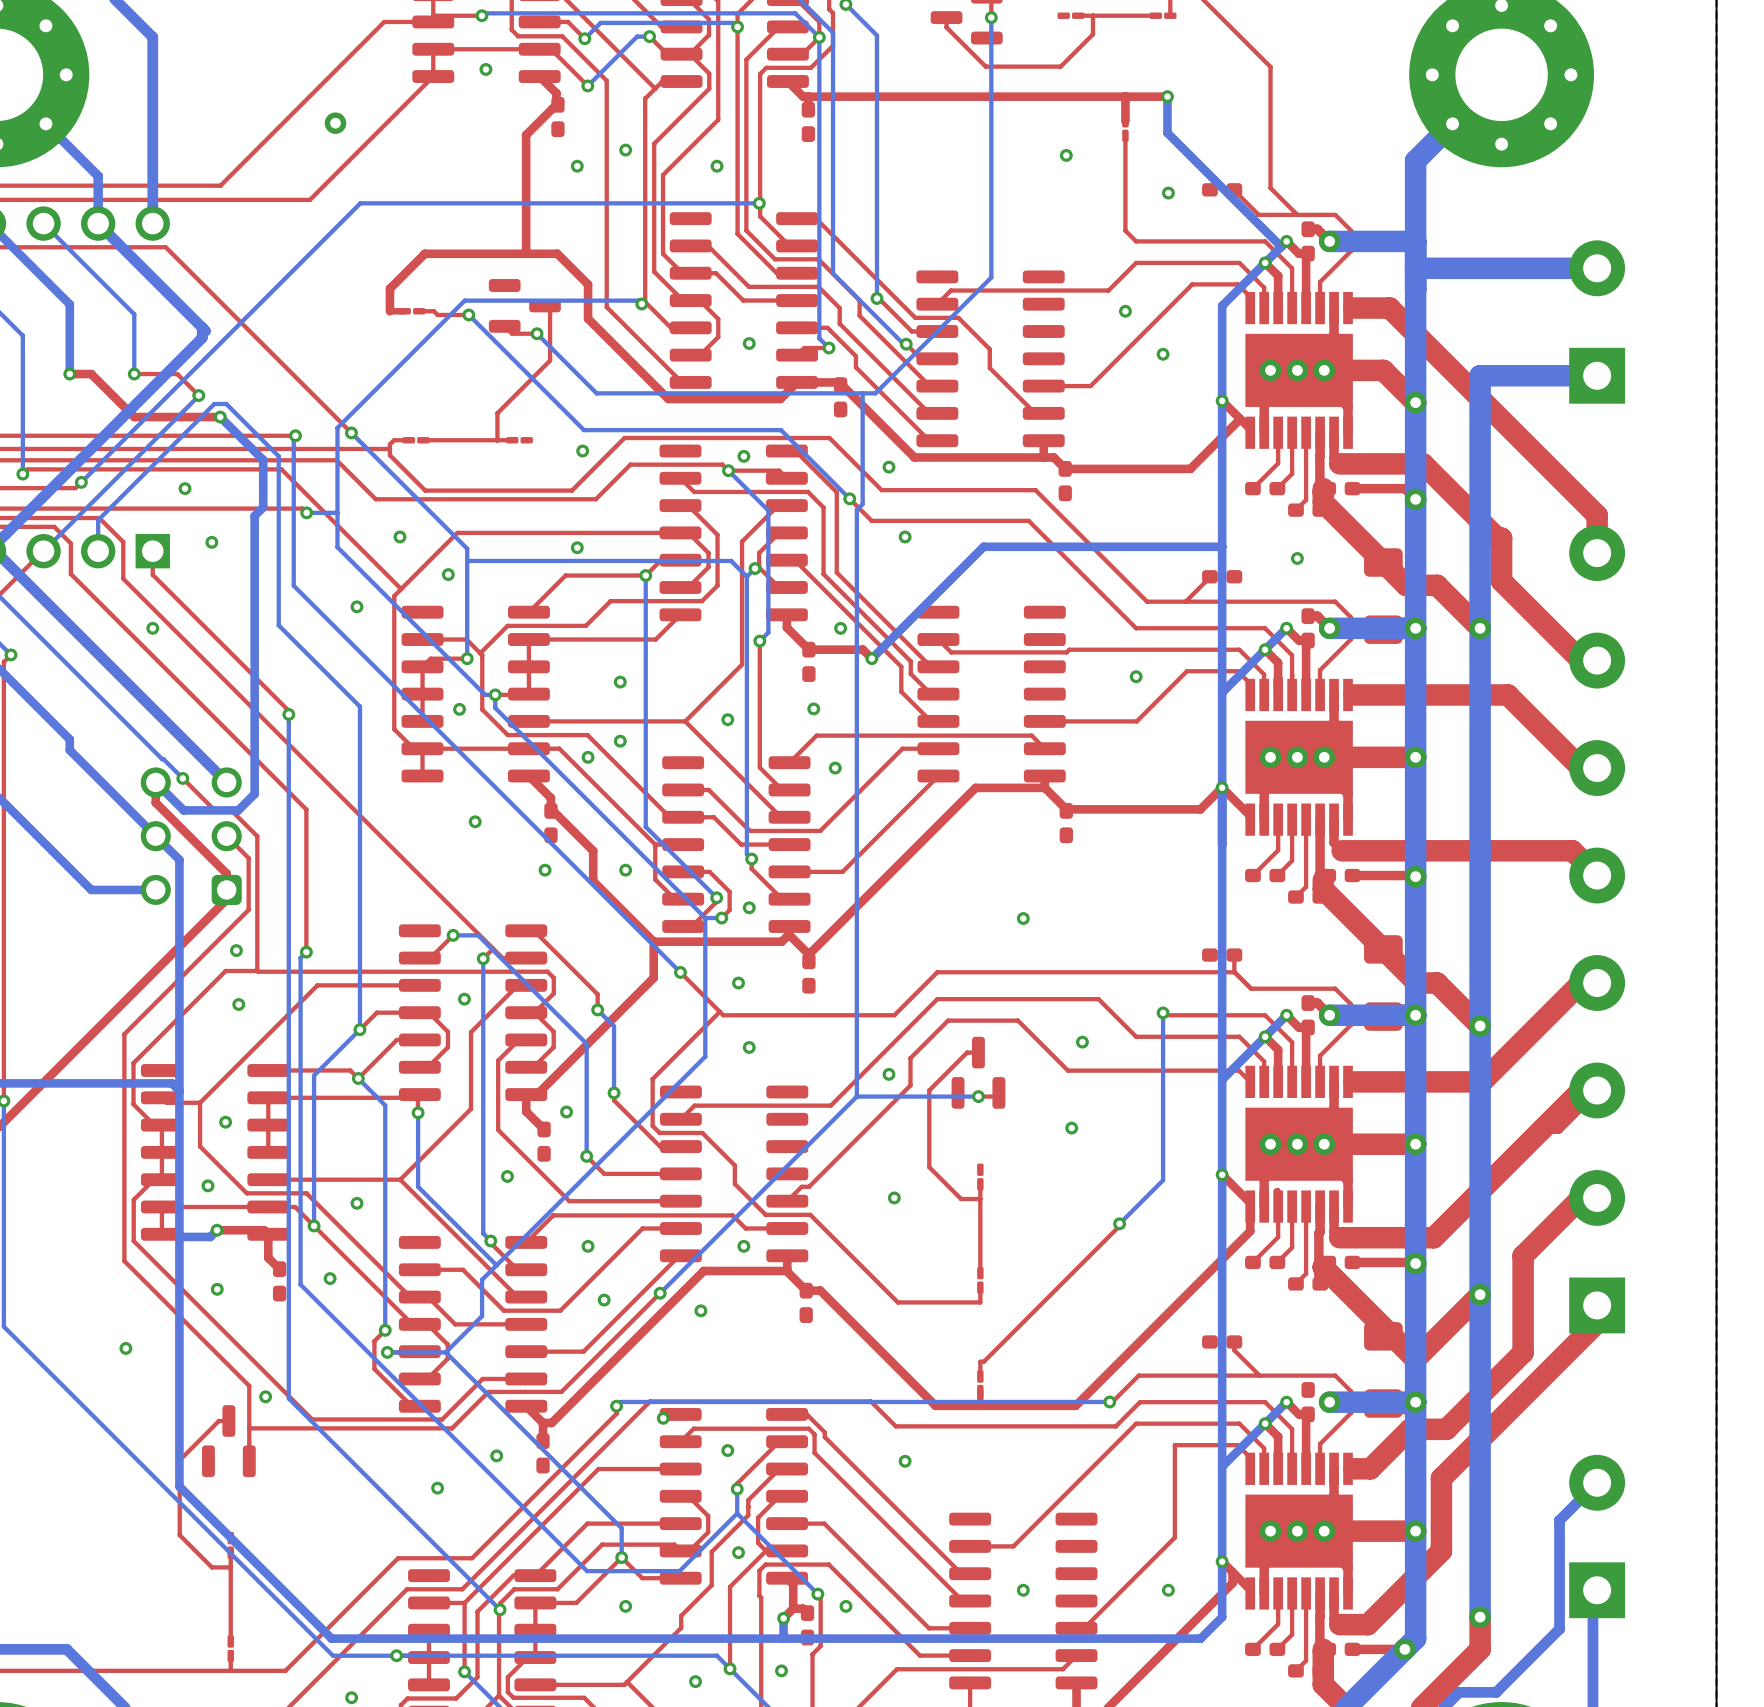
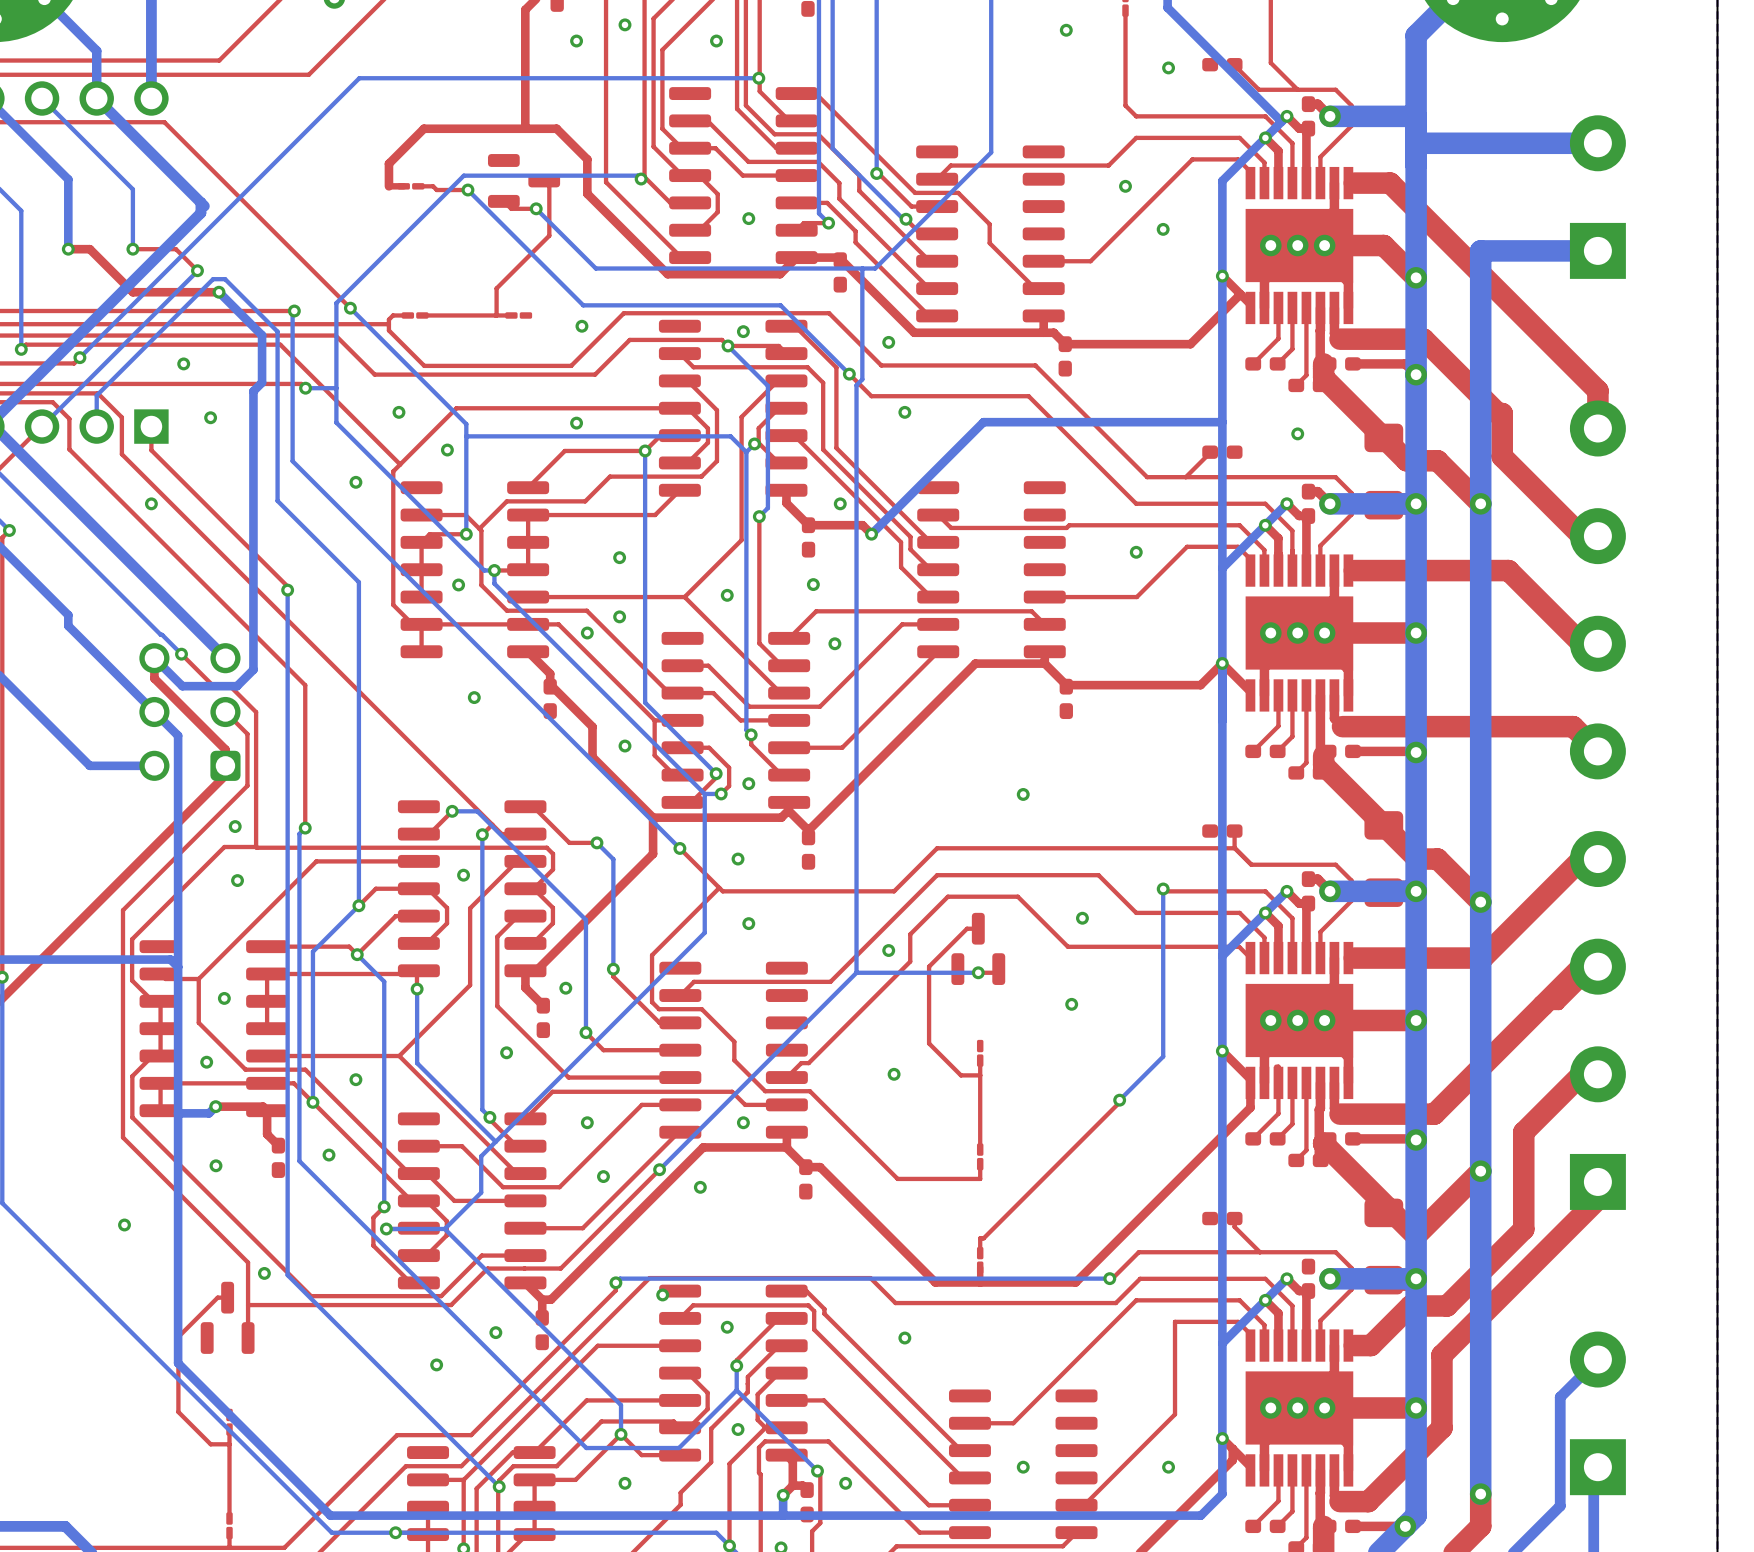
via: (545, 870) -> none
top track: (570, 966) (597, 994) (597, 1009) -> (569, 842) (596, 842)
bottom track: (597, 1009) (614, 1026) -> (596, 842) (613, 859) (613, 902)
via position: (597, 1009) -> (596, 842)

